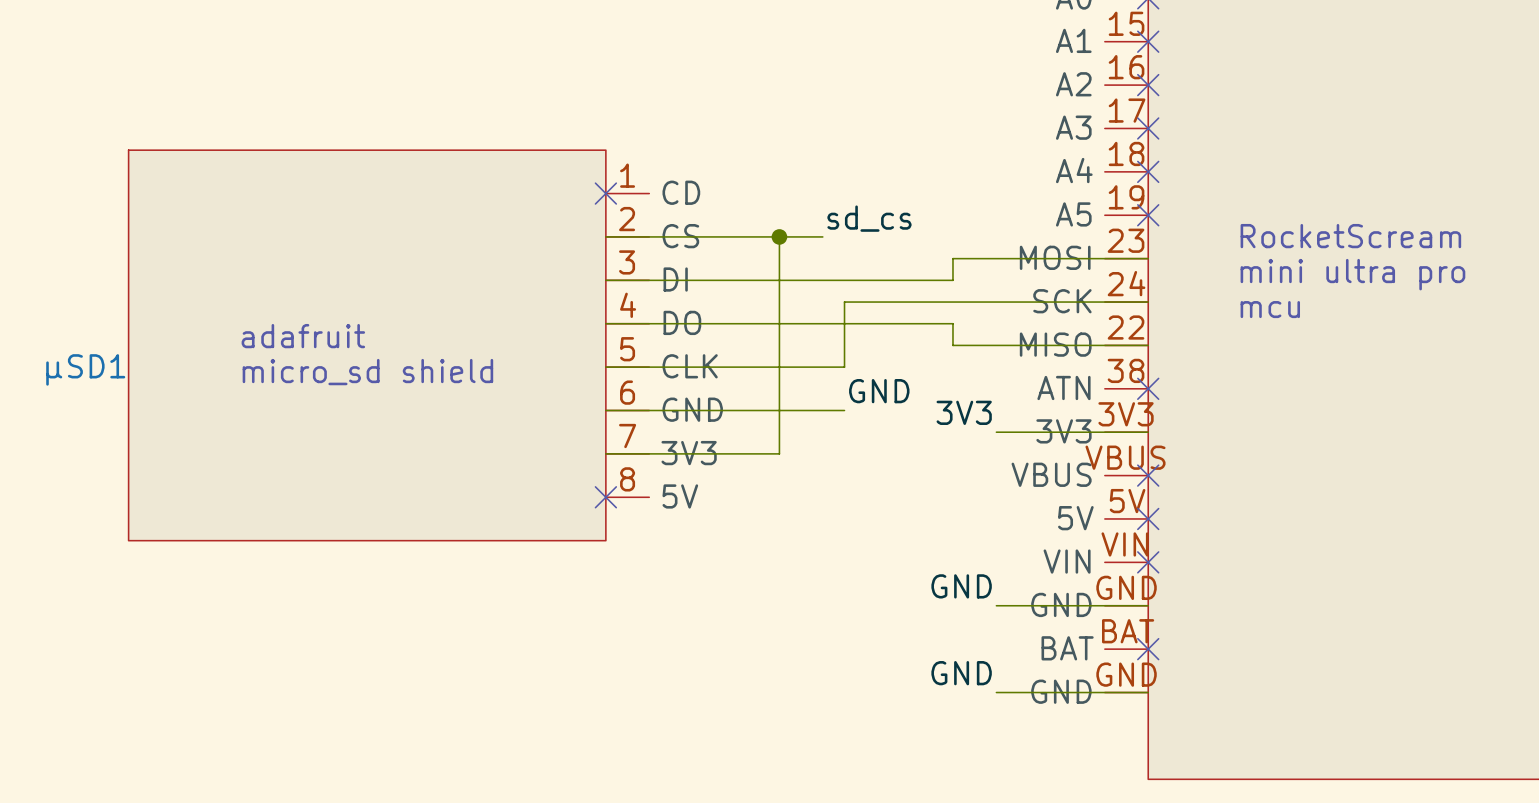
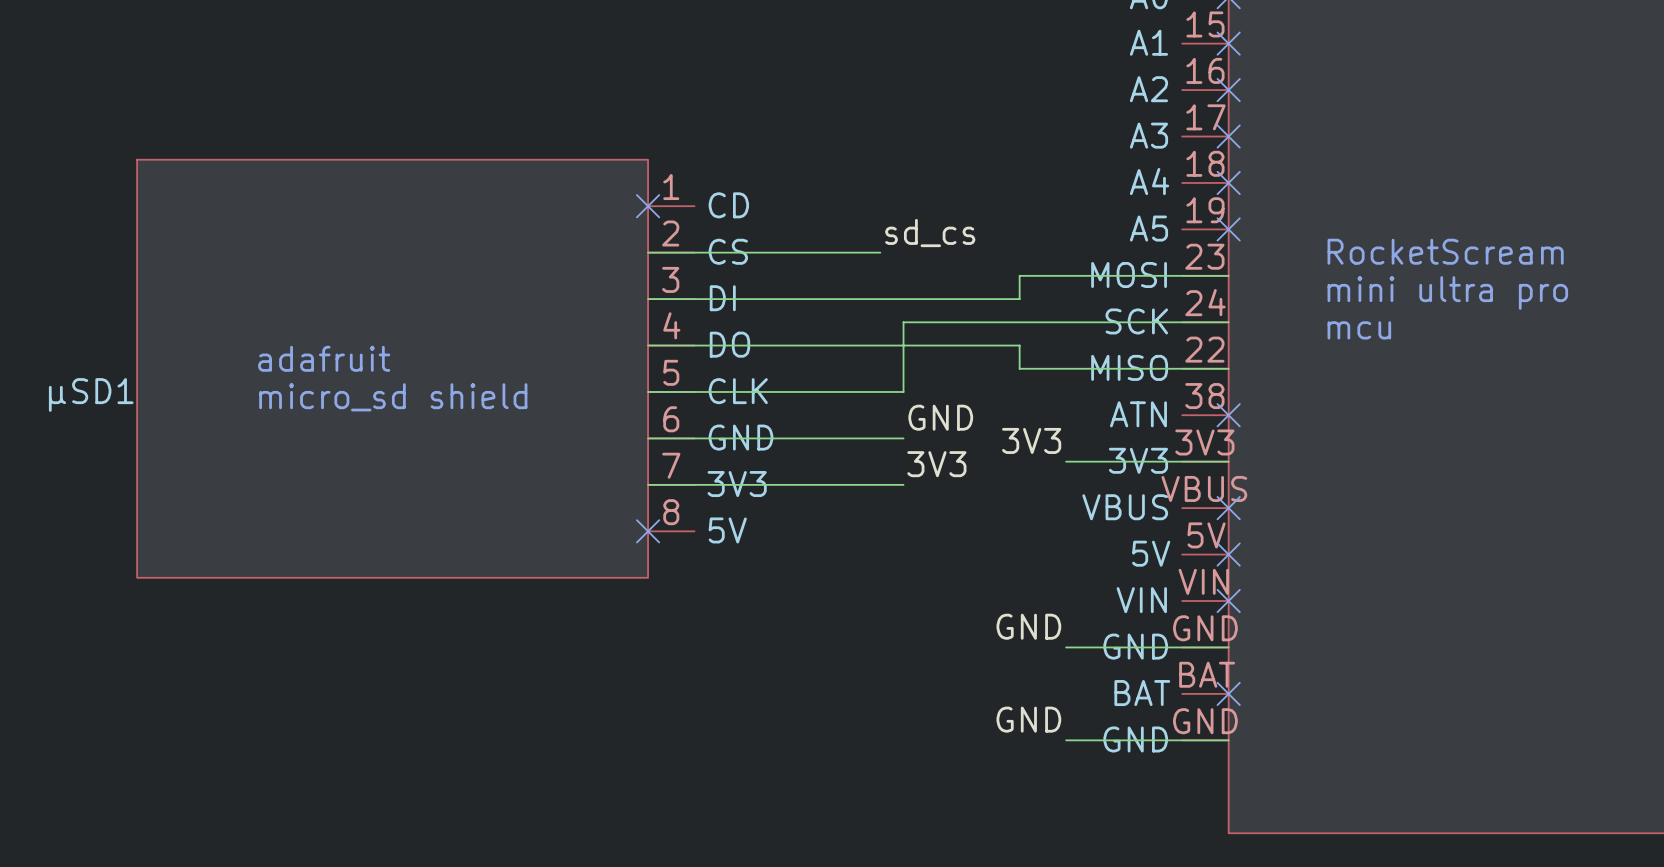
wire: (779, 236) (779, 453) -> (903, 484) (833, 484)
junction: (779, 236) -> none
label: none -> 3V3 (936, 464)

